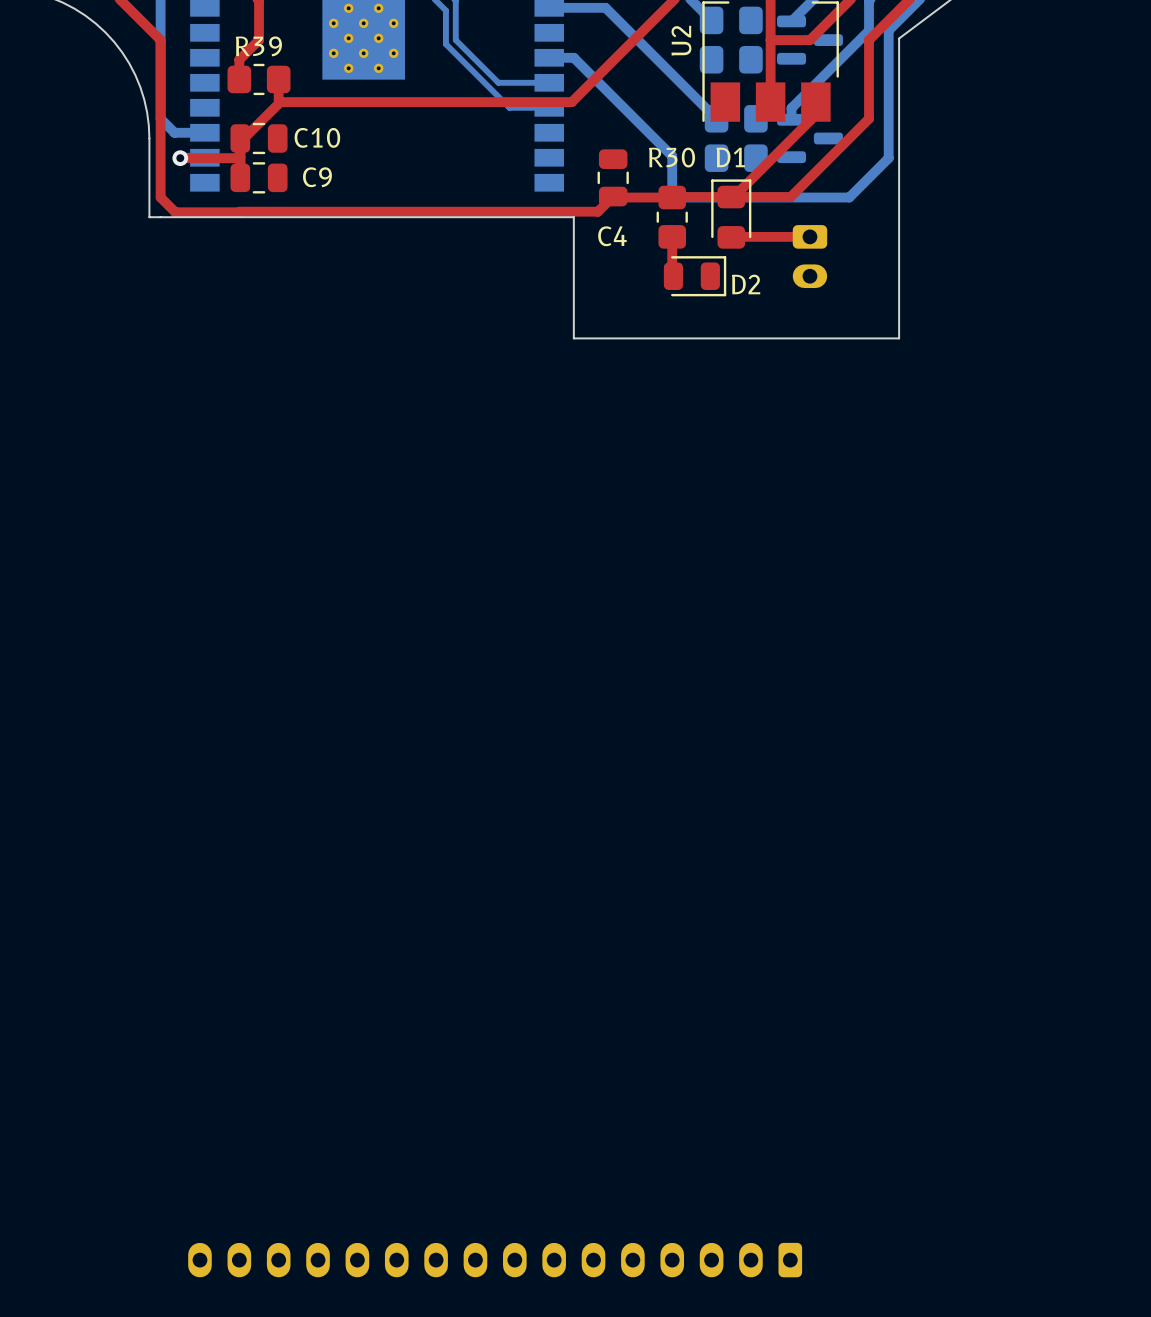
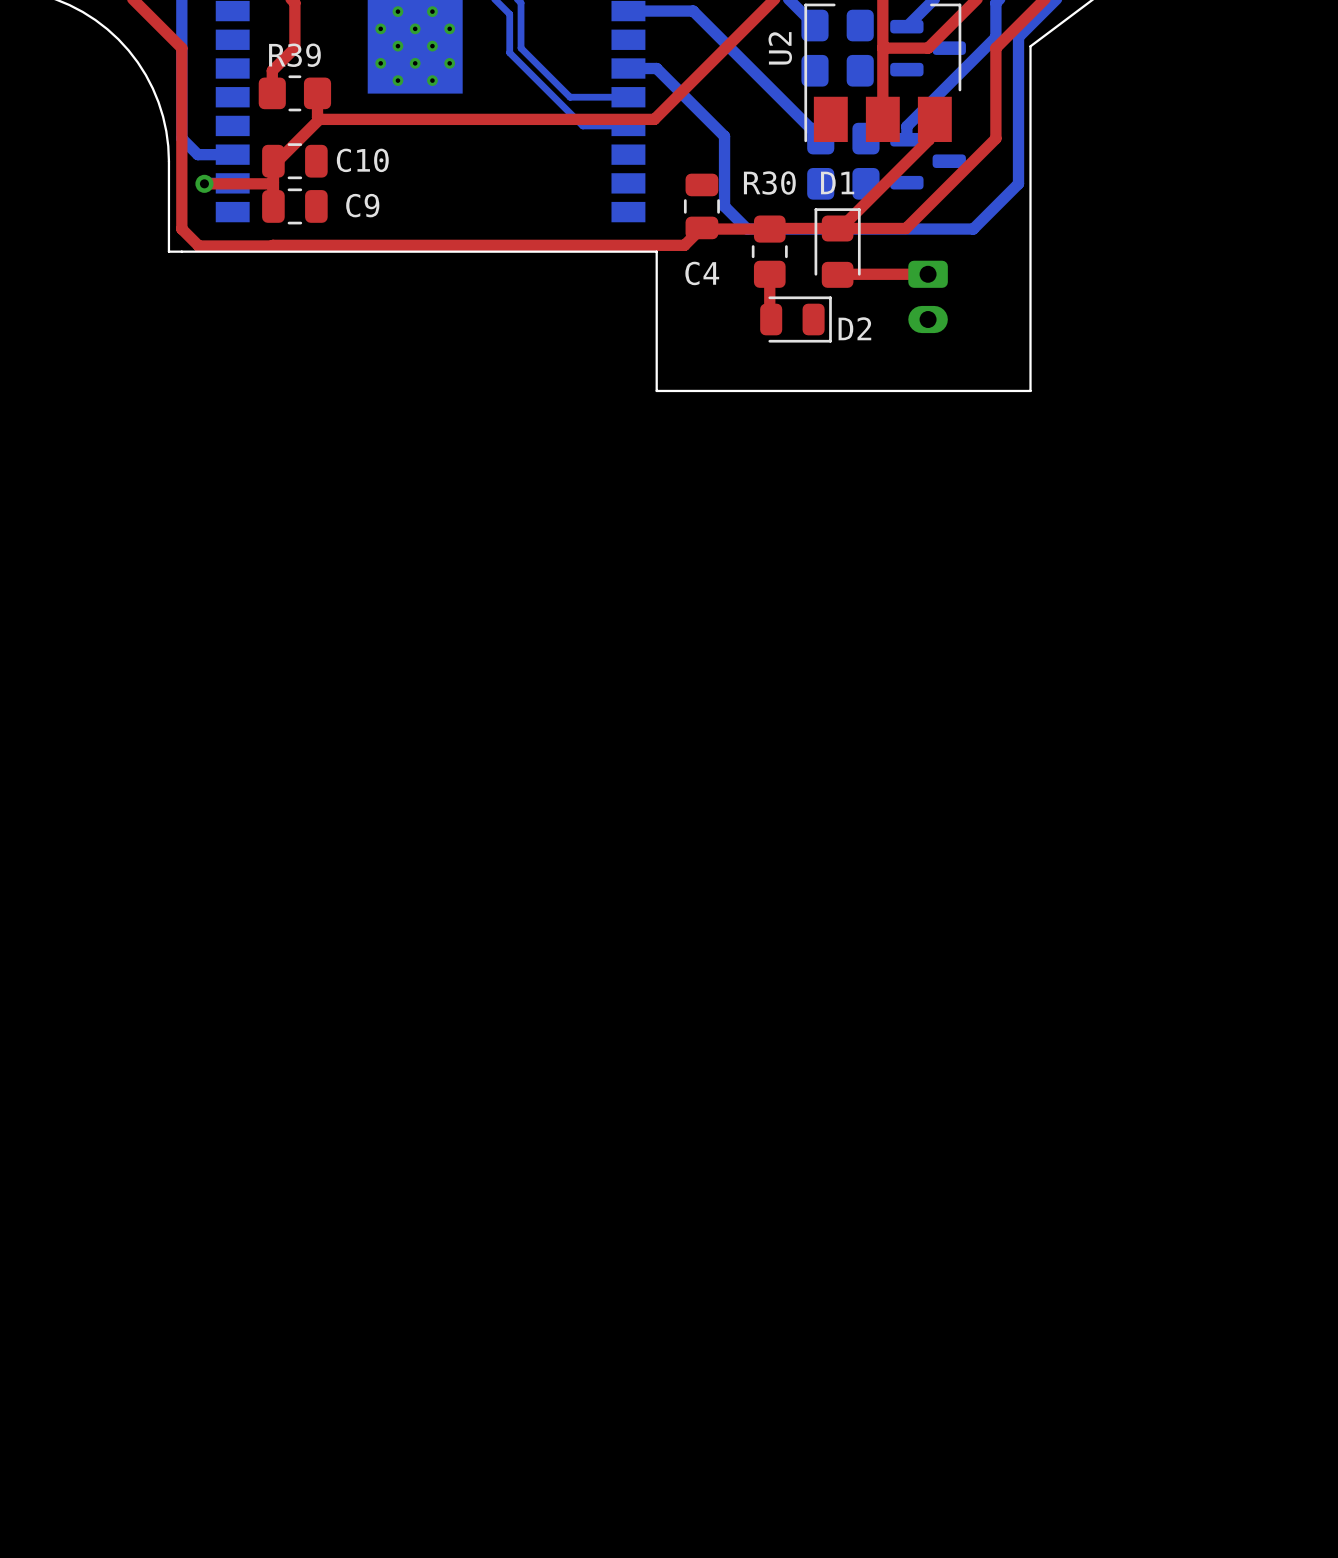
bottom track: (632, 116) (672, 156) (672, 197) -> (724, 136) (724, 206) (747, 229) (769, 229)
part: (495, 1260) -> none

